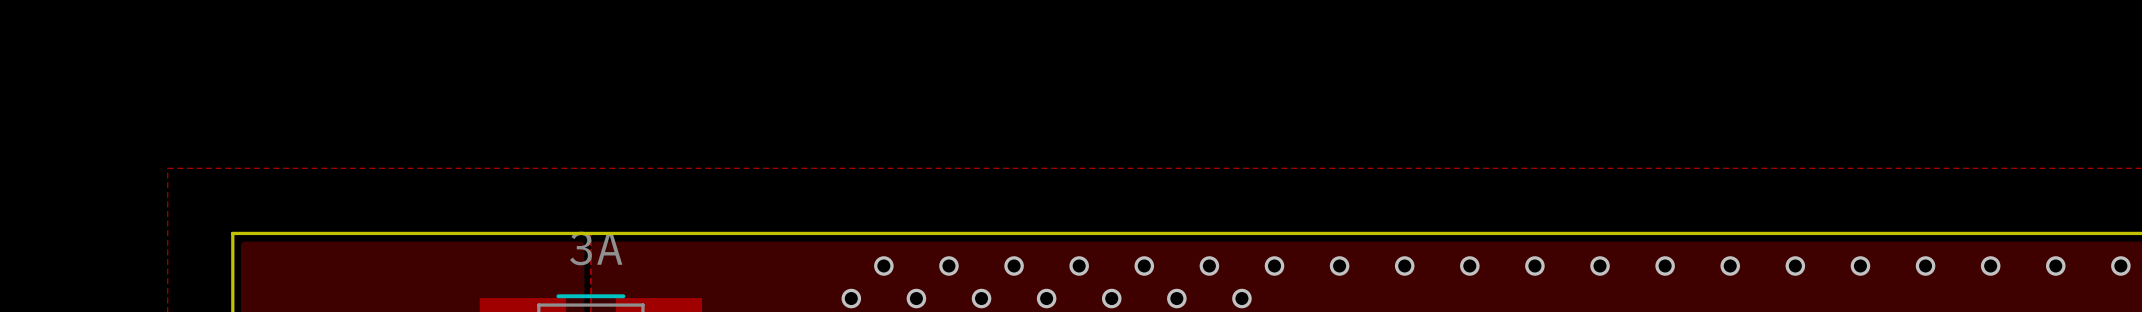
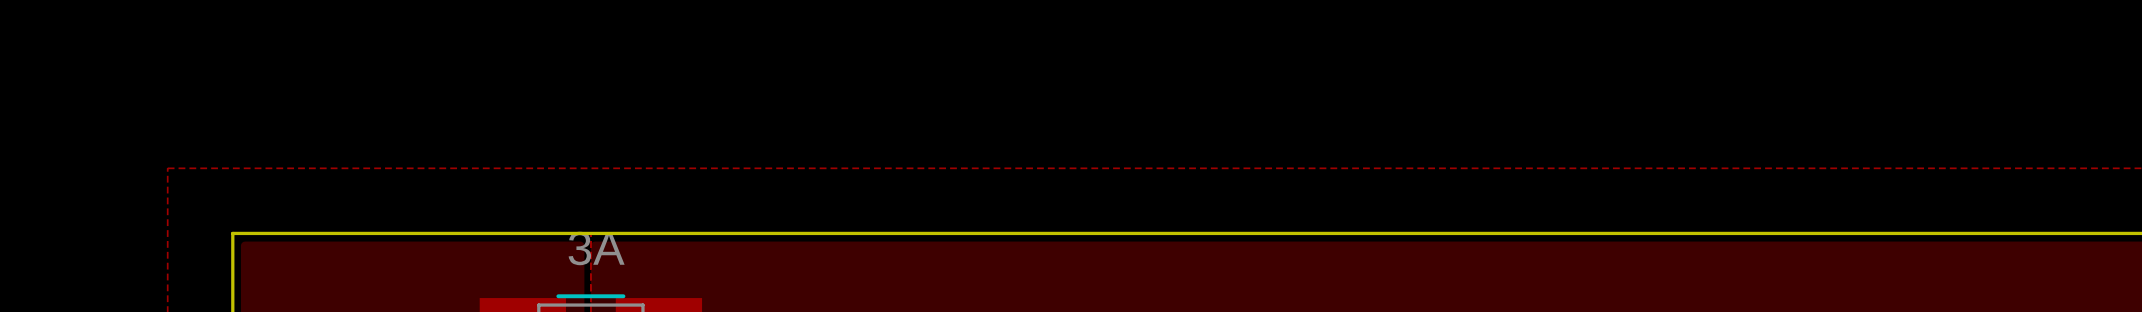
via: (883, 265) -> none
via: (948, 265) -> none
via: (1014, 265) -> none
via: (1079, 265) -> none
via: (1144, 265) -> none
via: (1209, 265) -> none
via: (1274, 265) -> none
via: (1339, 265) -> none
via: (1404, 265) -> none
via: (1469, 265) -> none
via: (1534, 265) -> none
via: (1600, 265) -> none
via: (1665, 265) -> none
via: (1730, 265) -> none
via: (1795, 265) -> none
via: (1860, 265) -> none
via: (1925, 265) -> none
via: (1990, 265) -> none
via: (2055, 265) -> none
via: (2120, 265) -> none
via: (851, 298) -> none
via: (916, 298) -> none
via: (981, 298) -> none
via: (1046, 298) -> none
via: (1111, 298) -> none
via: (1176, 298) -> none
via: (1241, 298) -> none

